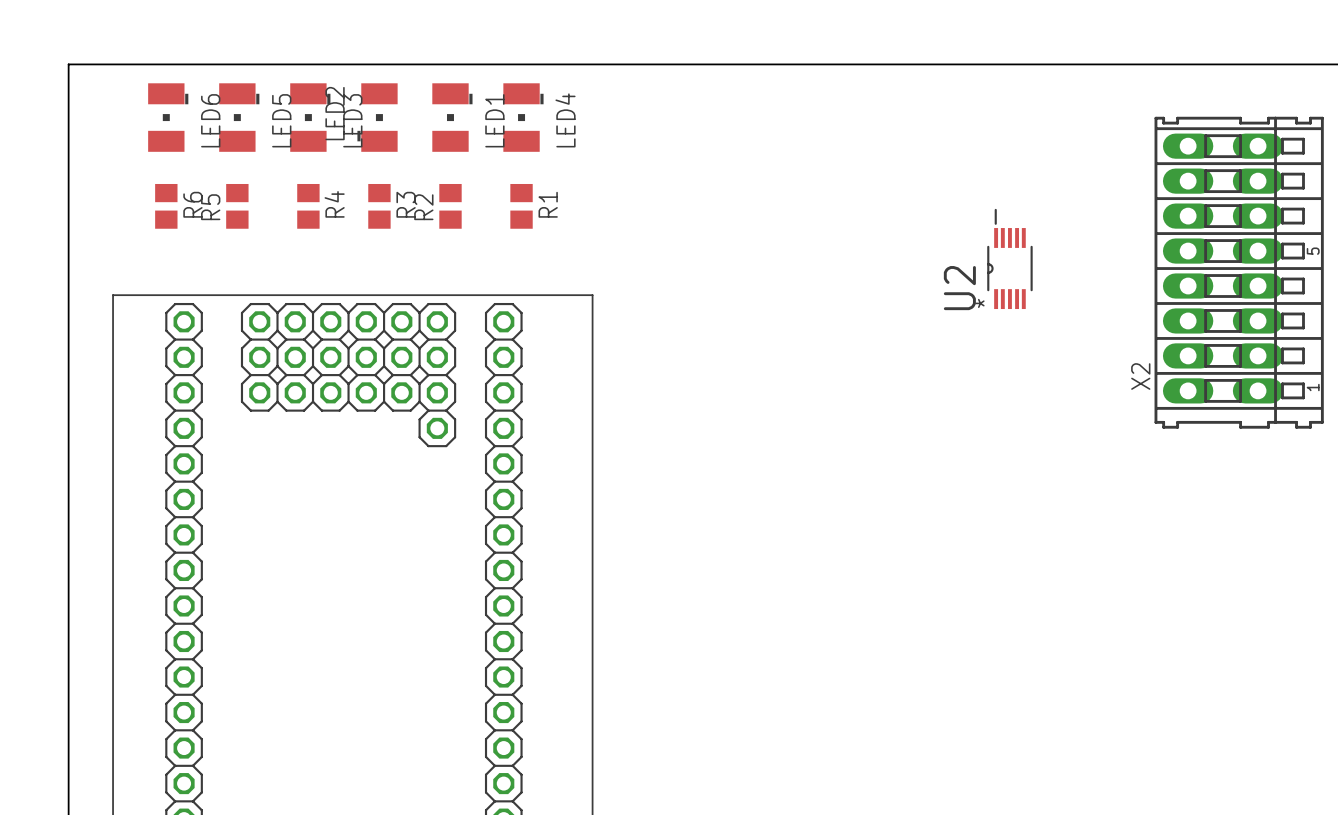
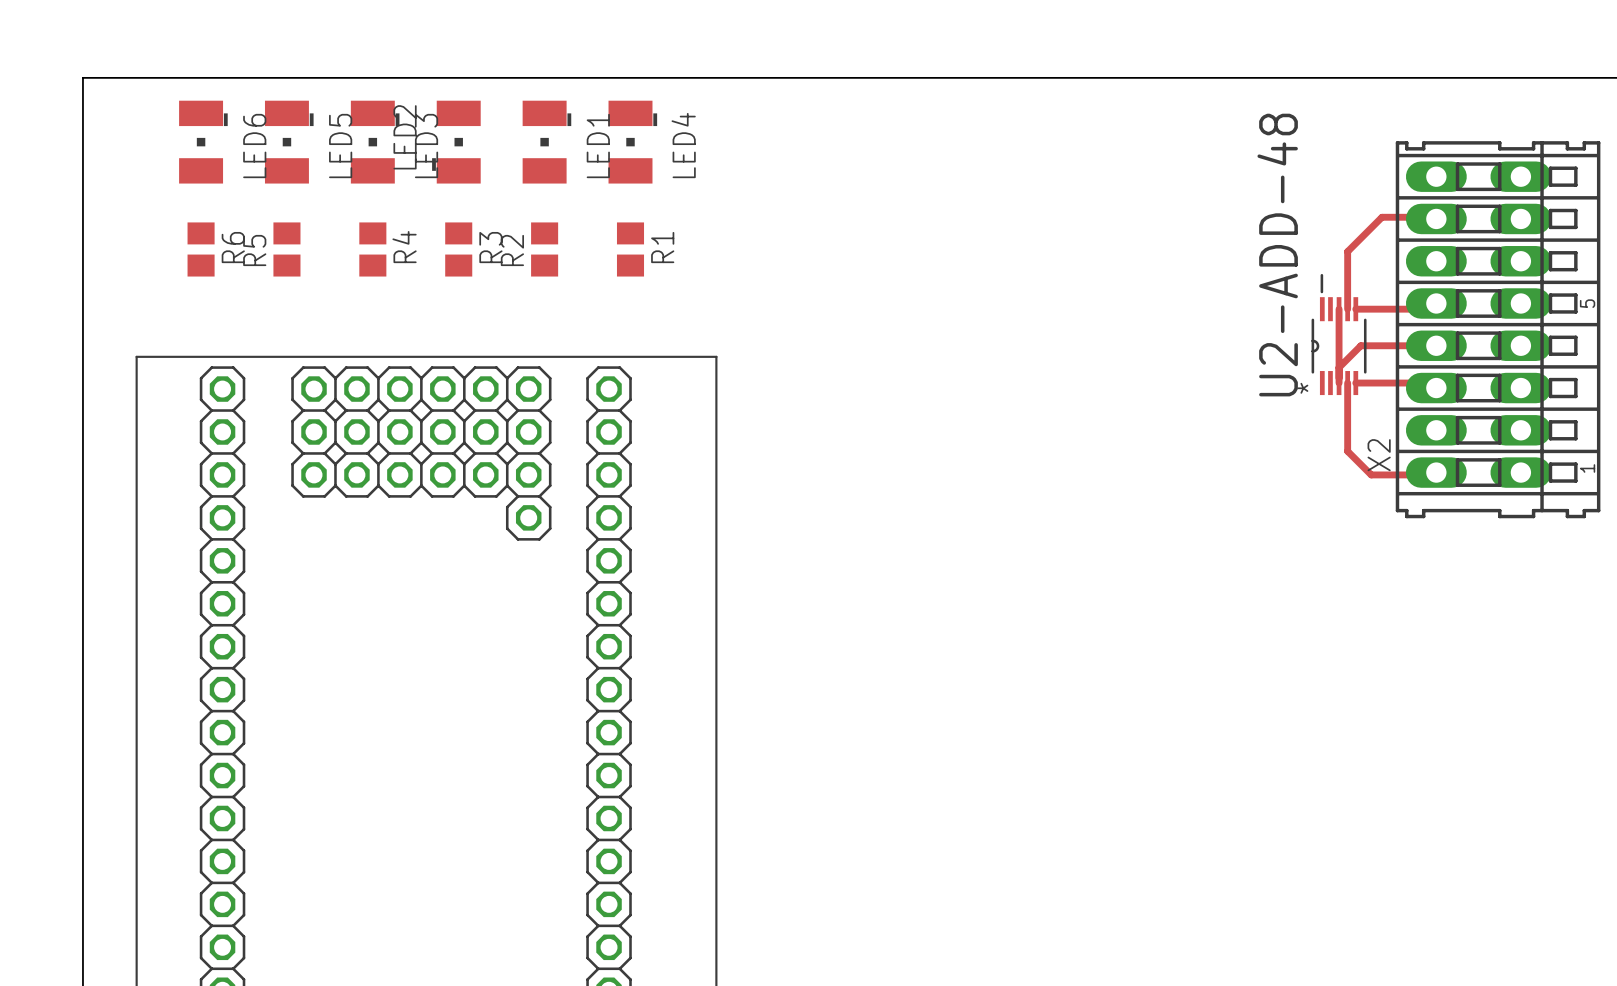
top track: none -> (1436, 218) (1434, 217) (1382, 217) (1347, 251) (1347, 309)
top track: none -> (1436, 303) (1430, 309) (1355, 309)
top track: none -> (1339, 309) (1339, 383)
U2: (1009, 258) -> none
U2-ADD-48: none -> (1339, 334)
top track: none -> (1436, 345) (1360, 345) (1339, 367)
top track: none -> (1347, 383) (1347, 451) (1371, 474) (1433, 474) (1436, 472)
top track: none -> (1355, 383) (1431, 383) (1436, 388)

